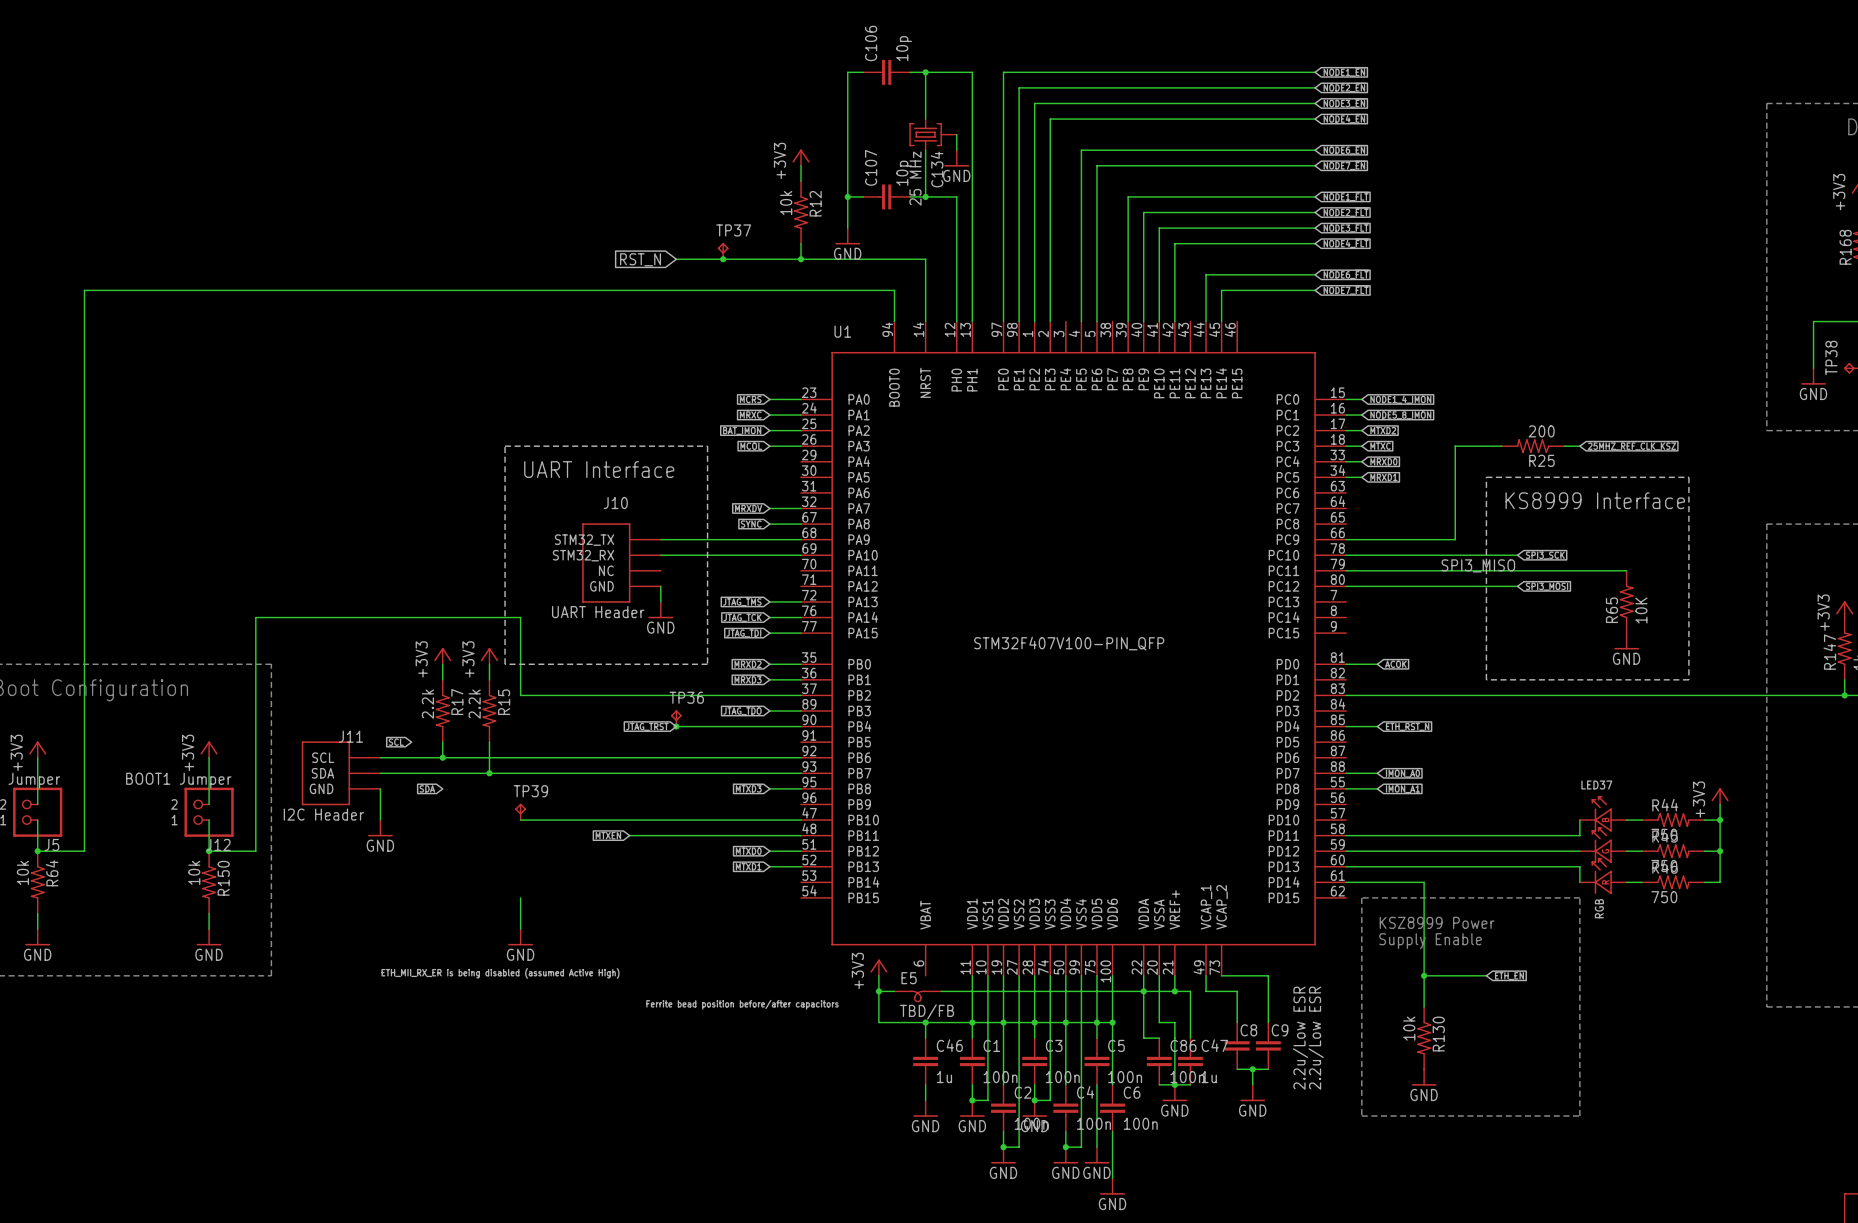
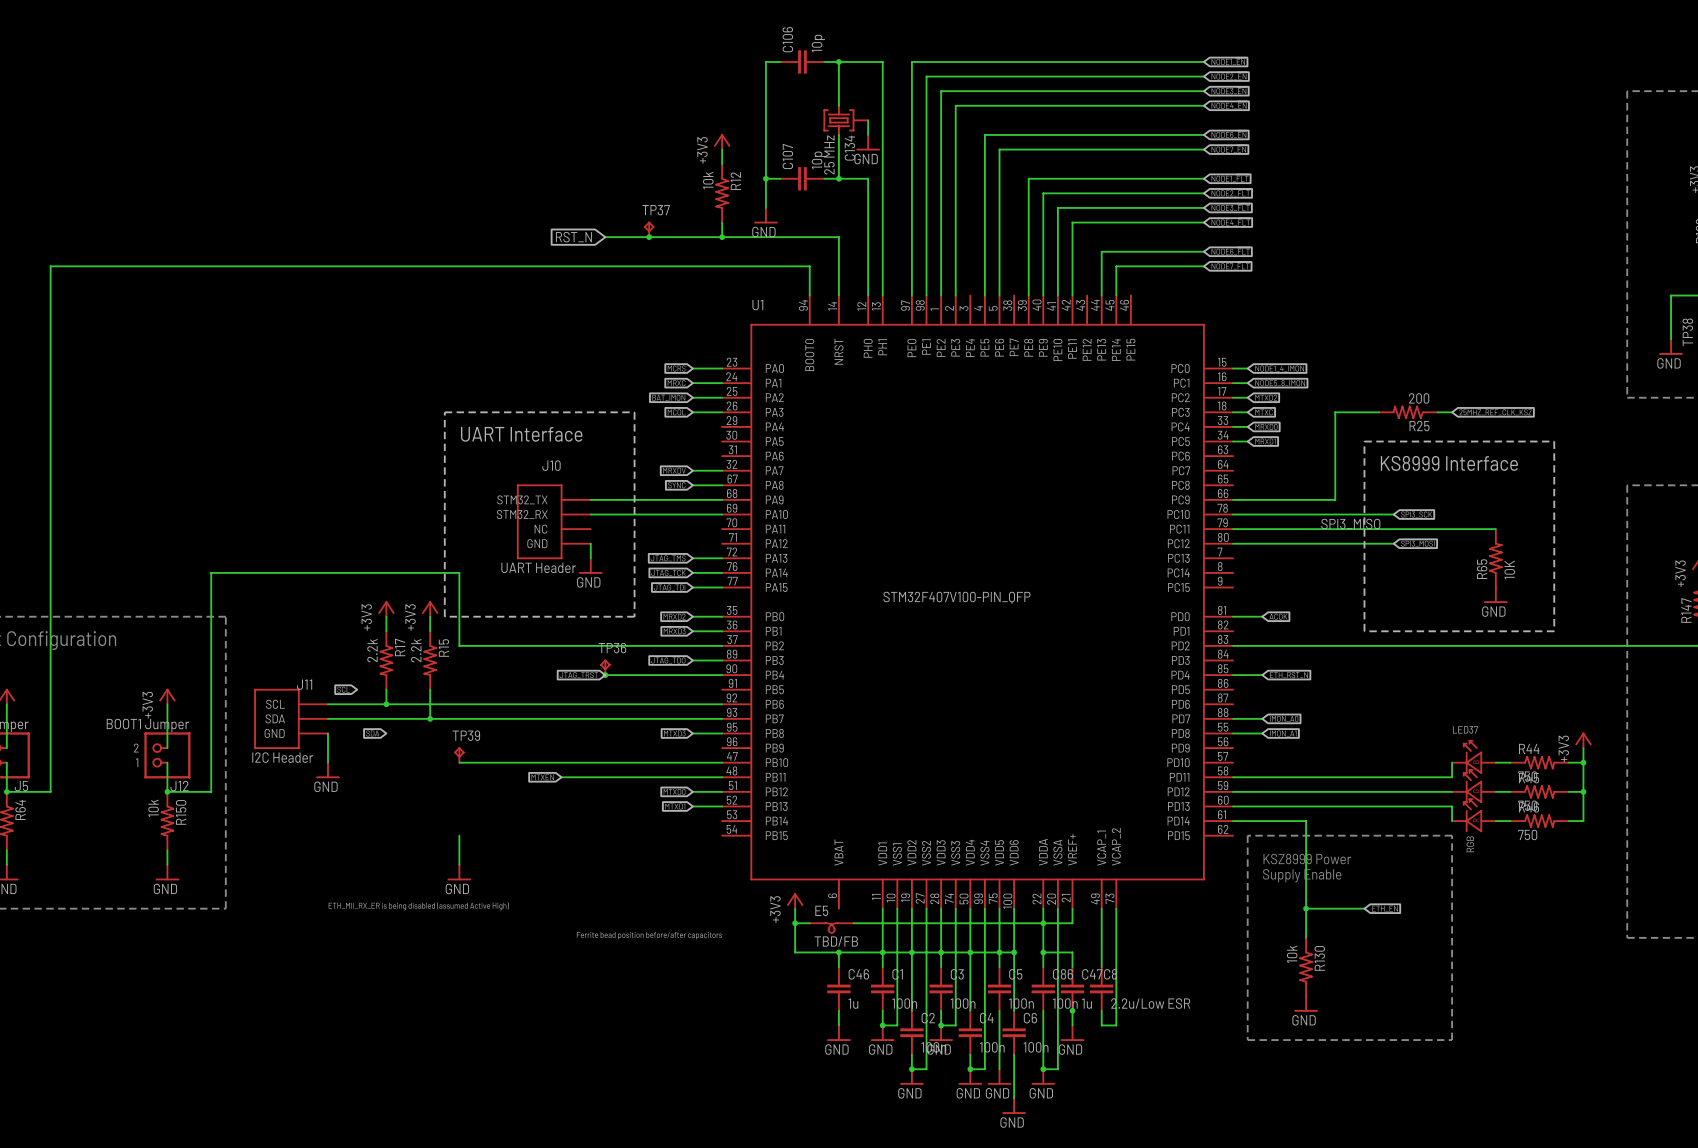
wire: (1221, 975) (1268, 975) (1268, 1022) -> (1116, 908) (1116, 1025) (1101, 1025) (1101, 1010)
wire: (1174, 991) (1190, 991) (1190, 1038) -> none
junction: (1174, 991) -> none
wire: (1206, 991) (1237, 991) (1237, 1022) -> (1101, 923) (1101, 967)
wire: none -> (1043, 952) (1057, 952) (1057, 1069) (1043, 1069) (1043, 1010)
junction: none -> (1043, 952)
wire: (1143, 1038) (1159, 1038) -> none
C8 value rotation: 0° (1316, 1038) -> 90° clockwise (1150, 1003)
C8 position: (1237, 1045) -> (1101, 988)
C9: 2.2u/Low ESR (1268, 1045) -> none
C86 position: (1159, 1061) -> (1043, 988)
C47 position: (1190, 1061) -> (1072, 988)
wire: (1237, 1069) (1268, 1069) -> none
wire: (1252, 1069) (1252, 1084) -> none
junction: (1252, 1069) -> none
wire: (1159, 1084) (1190, 1084) -> none
power symbol position: GND (1174, 1093) -> GND (1072, 1033)
power symbol: GND (1252, 1093) -> none
junction: none -> (1043, 1069)
power symbol: none -> GND (1043, 1076)

